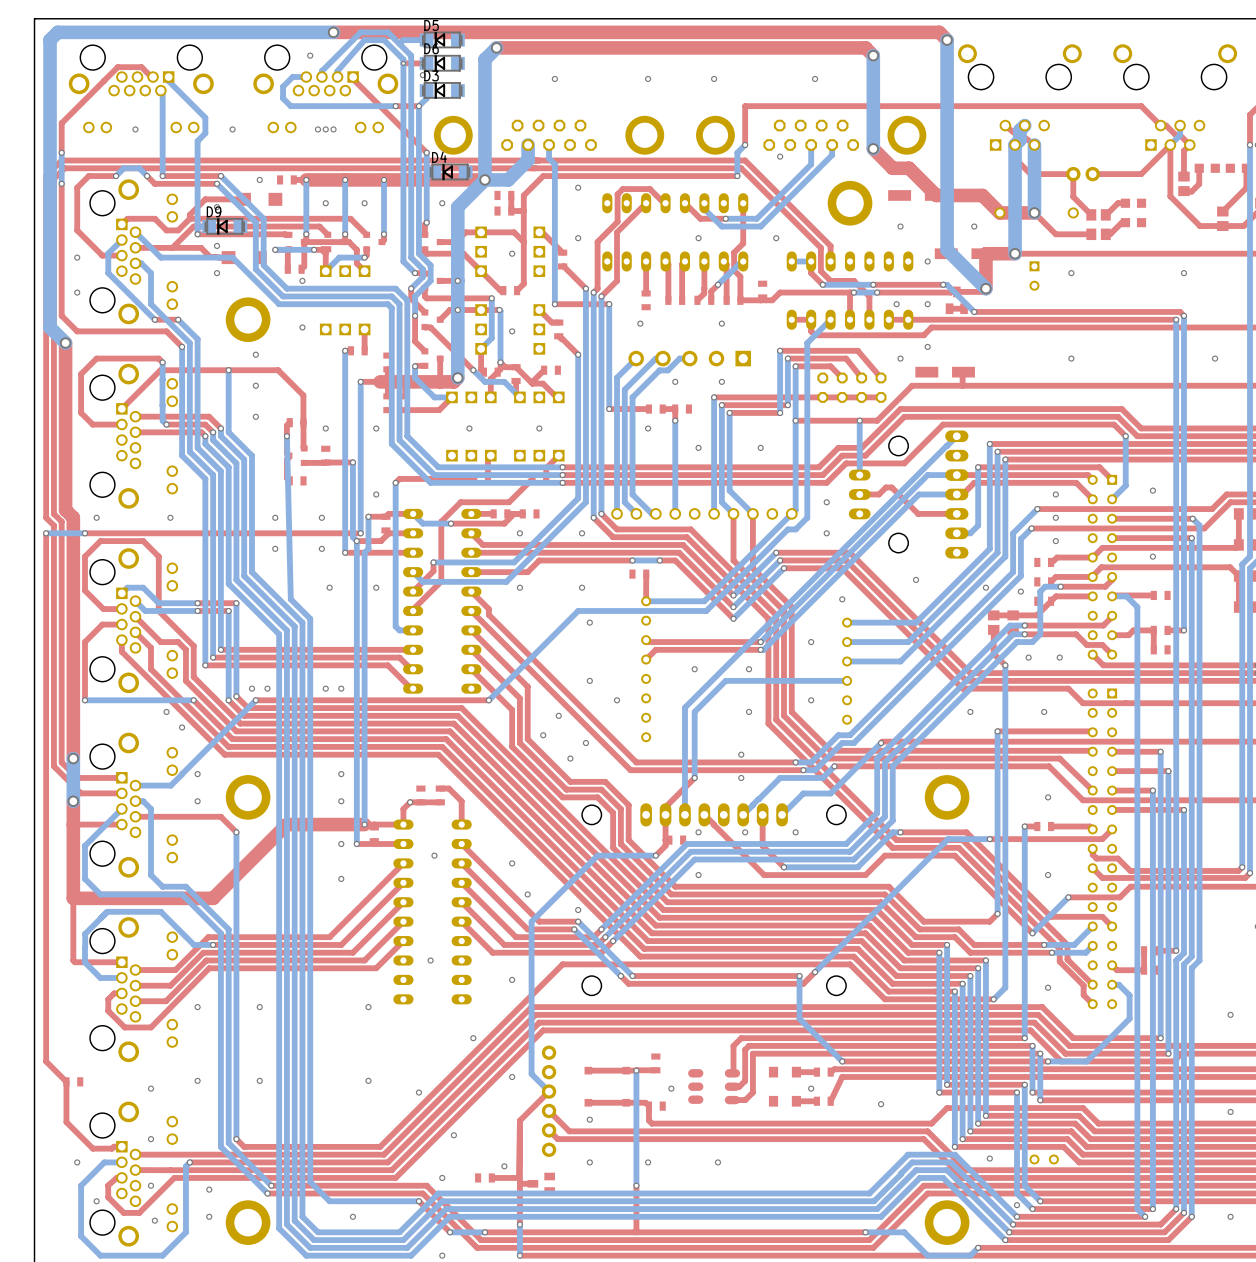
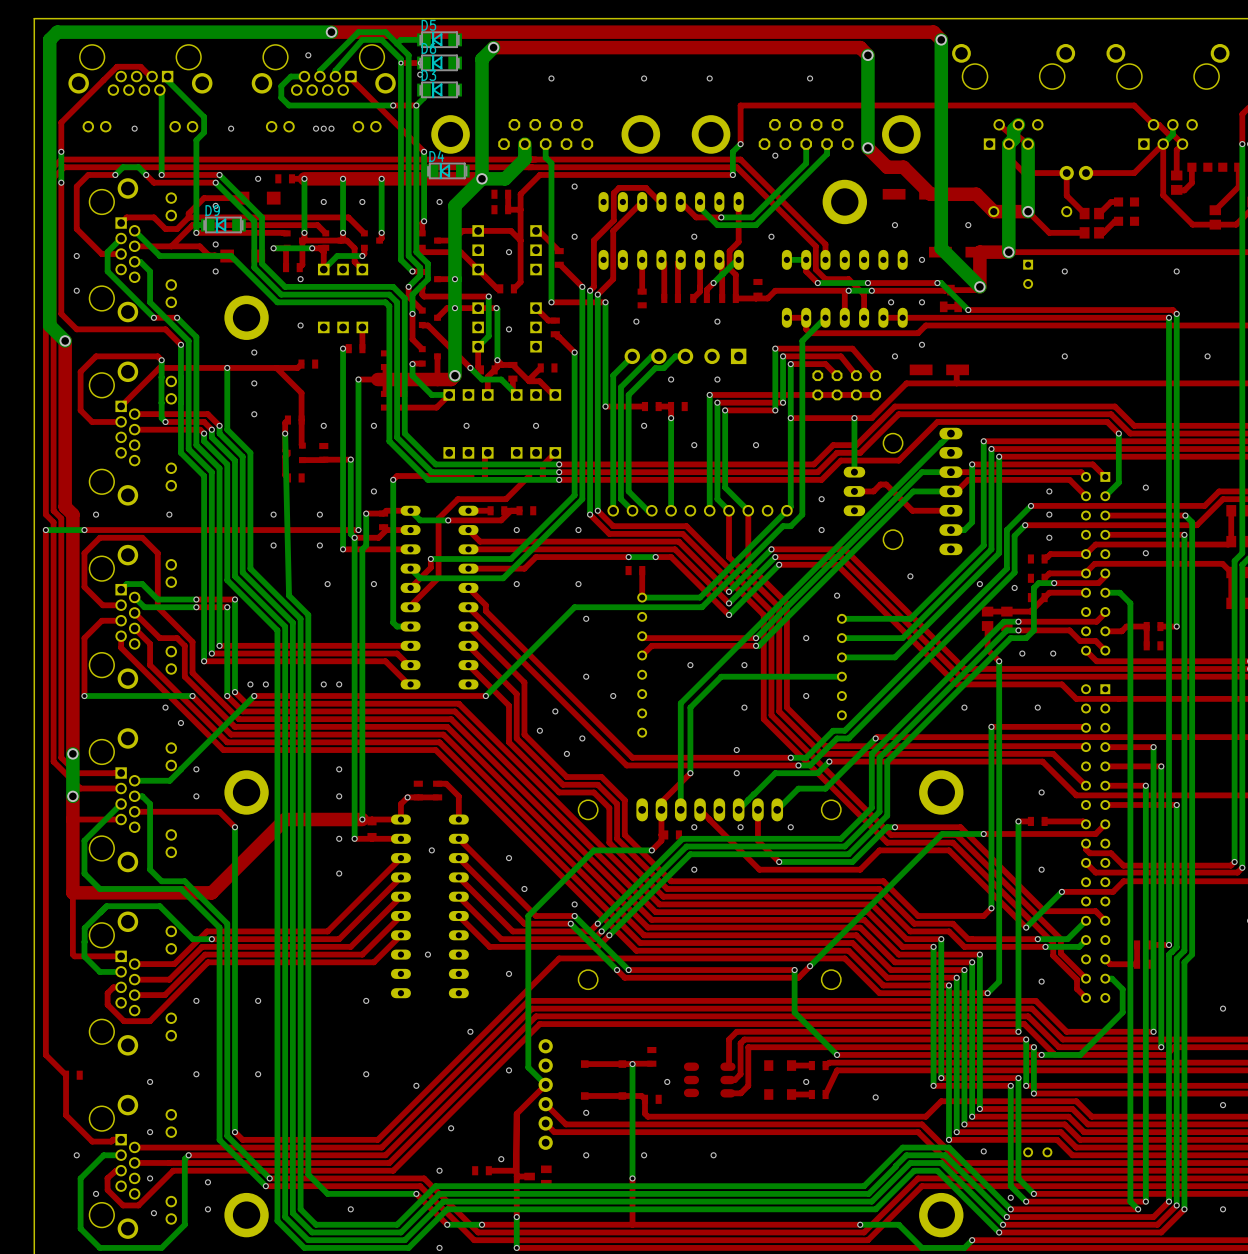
top track: none -> (301, 364) (297, 367) (276, 367)
part: none -> (308, 364)
top track: (1153, 595) (1112, 596) -> none
part: (1160, 595) -> none

